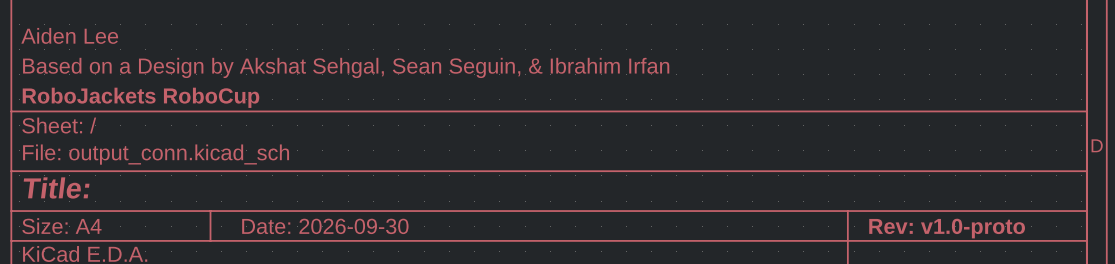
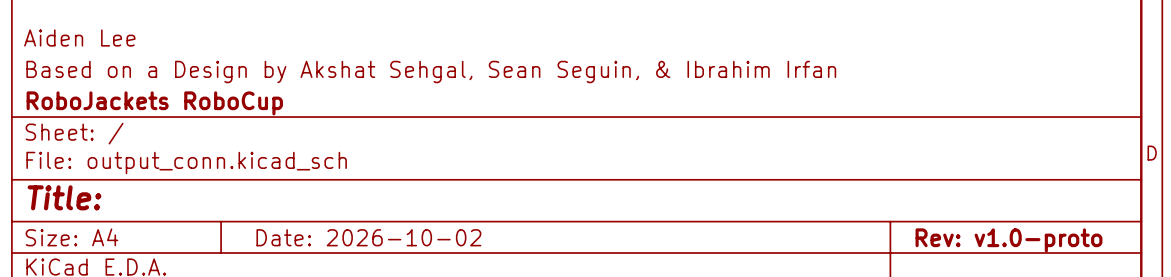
title block: Date: 2026-09-30 (325, 226) -> Date: 2026-10-02 (368, 237)

